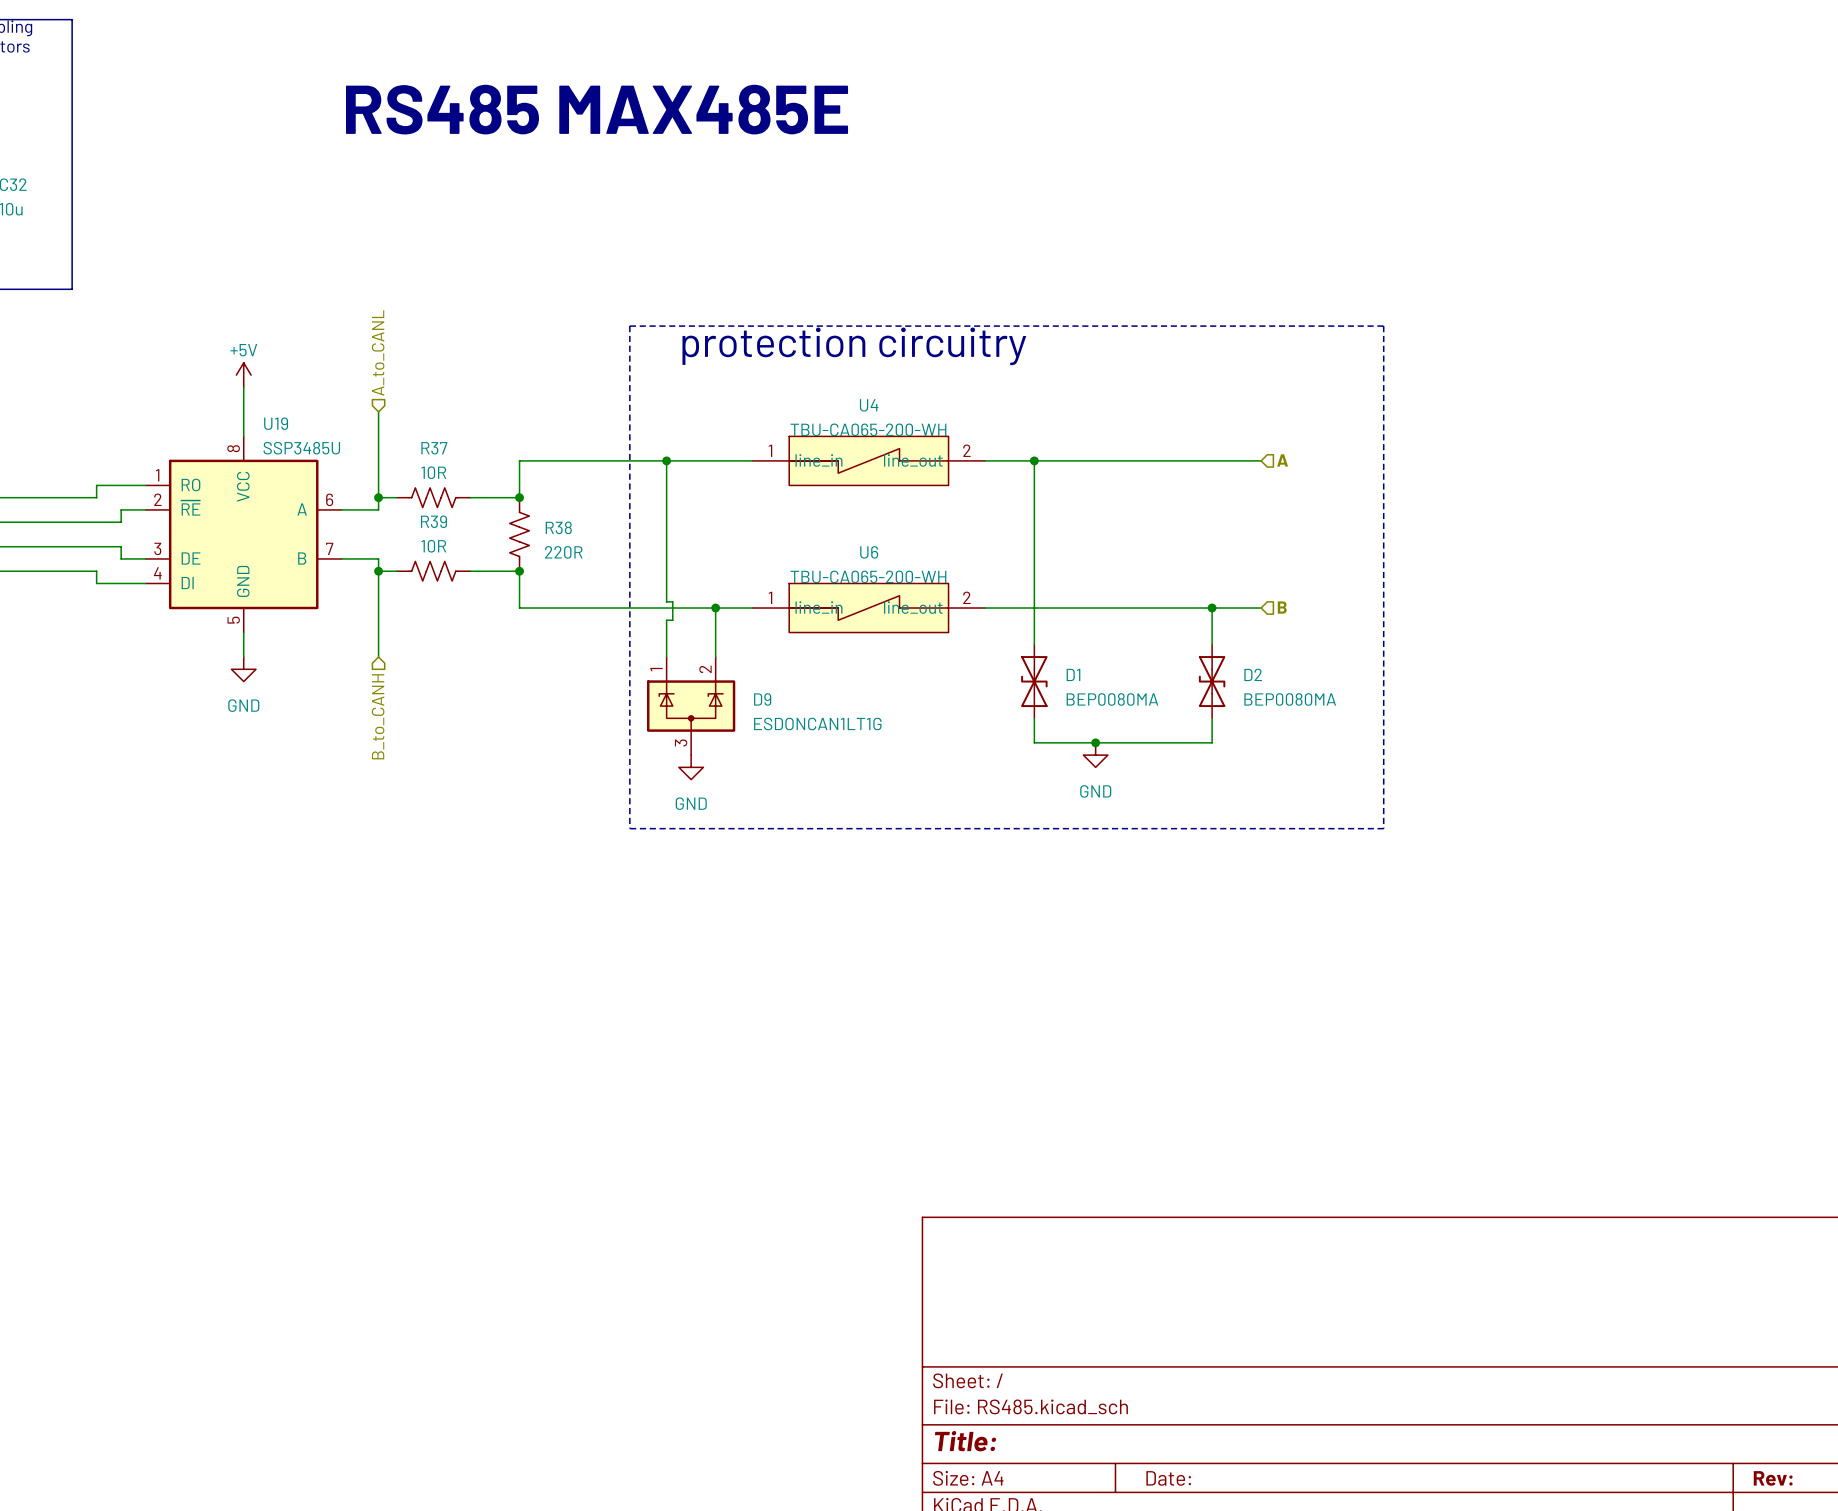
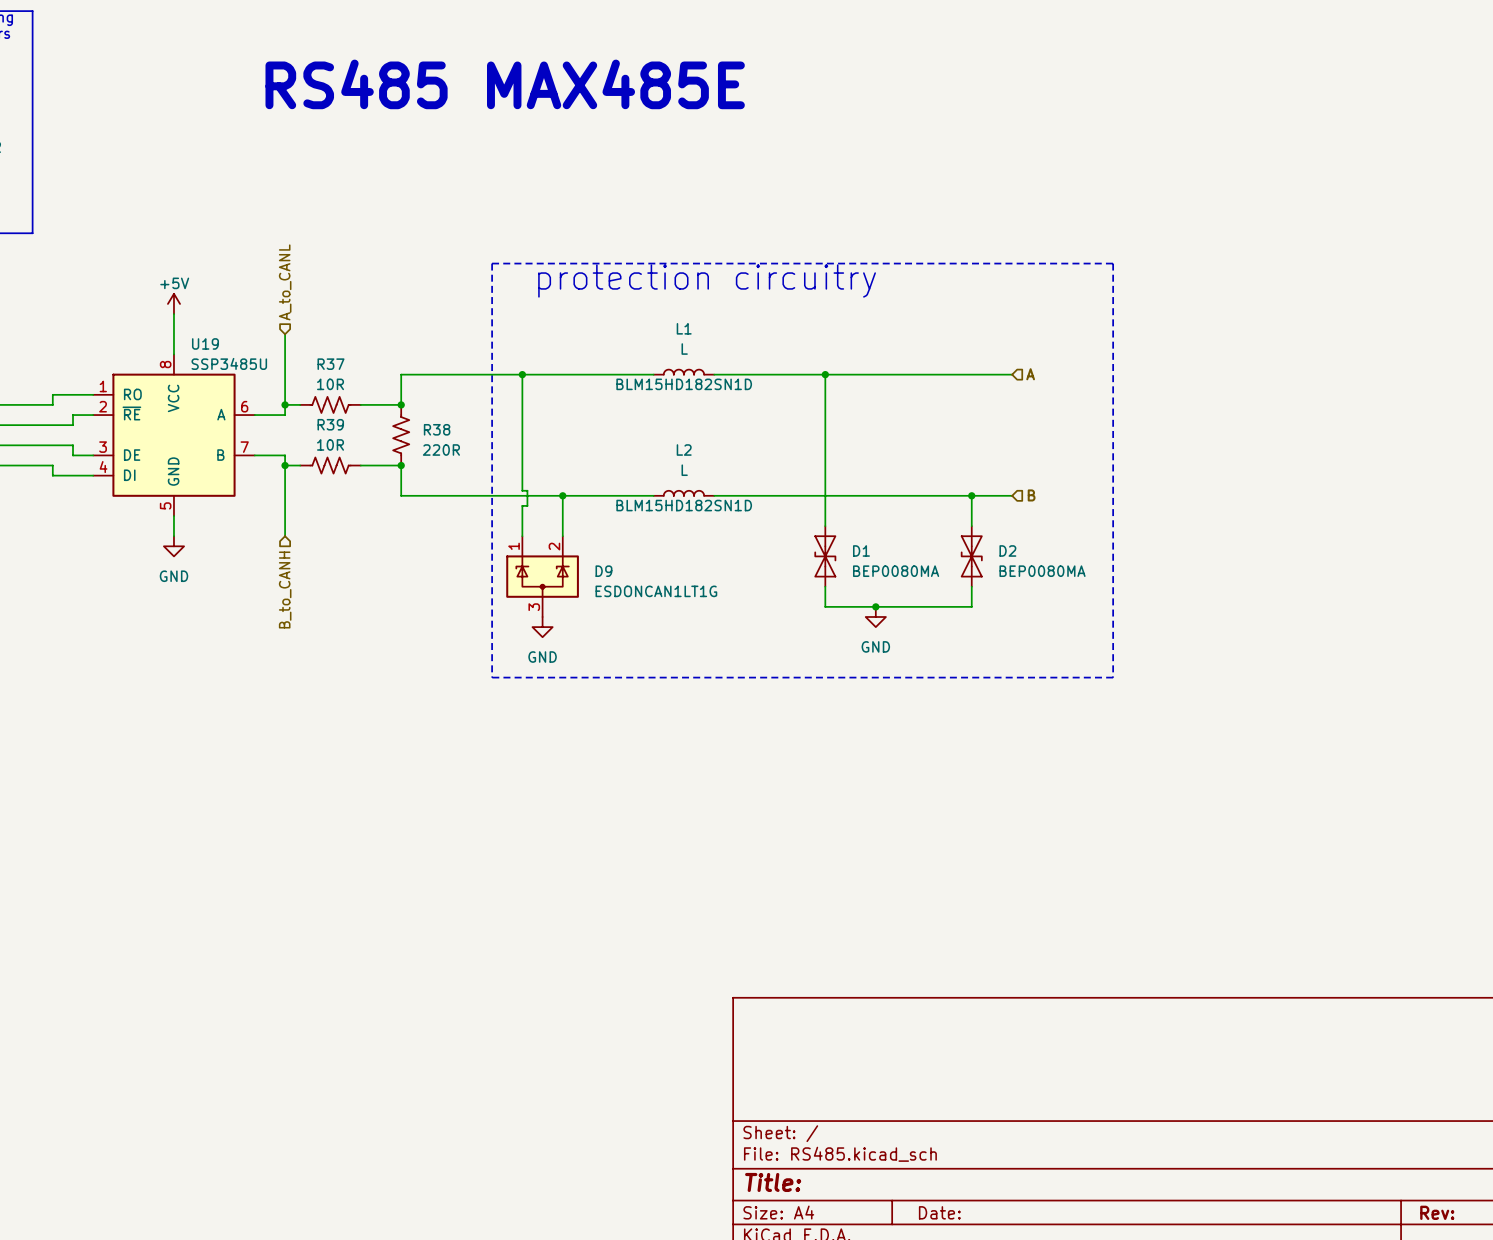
L1: none -> L (683, 372)
U4: TBU-CA065-200-WH (868, 460) -> none
L2: none -> L (683, 493)
U6: TBU-CA065-200-WH (868, 608) -> none

